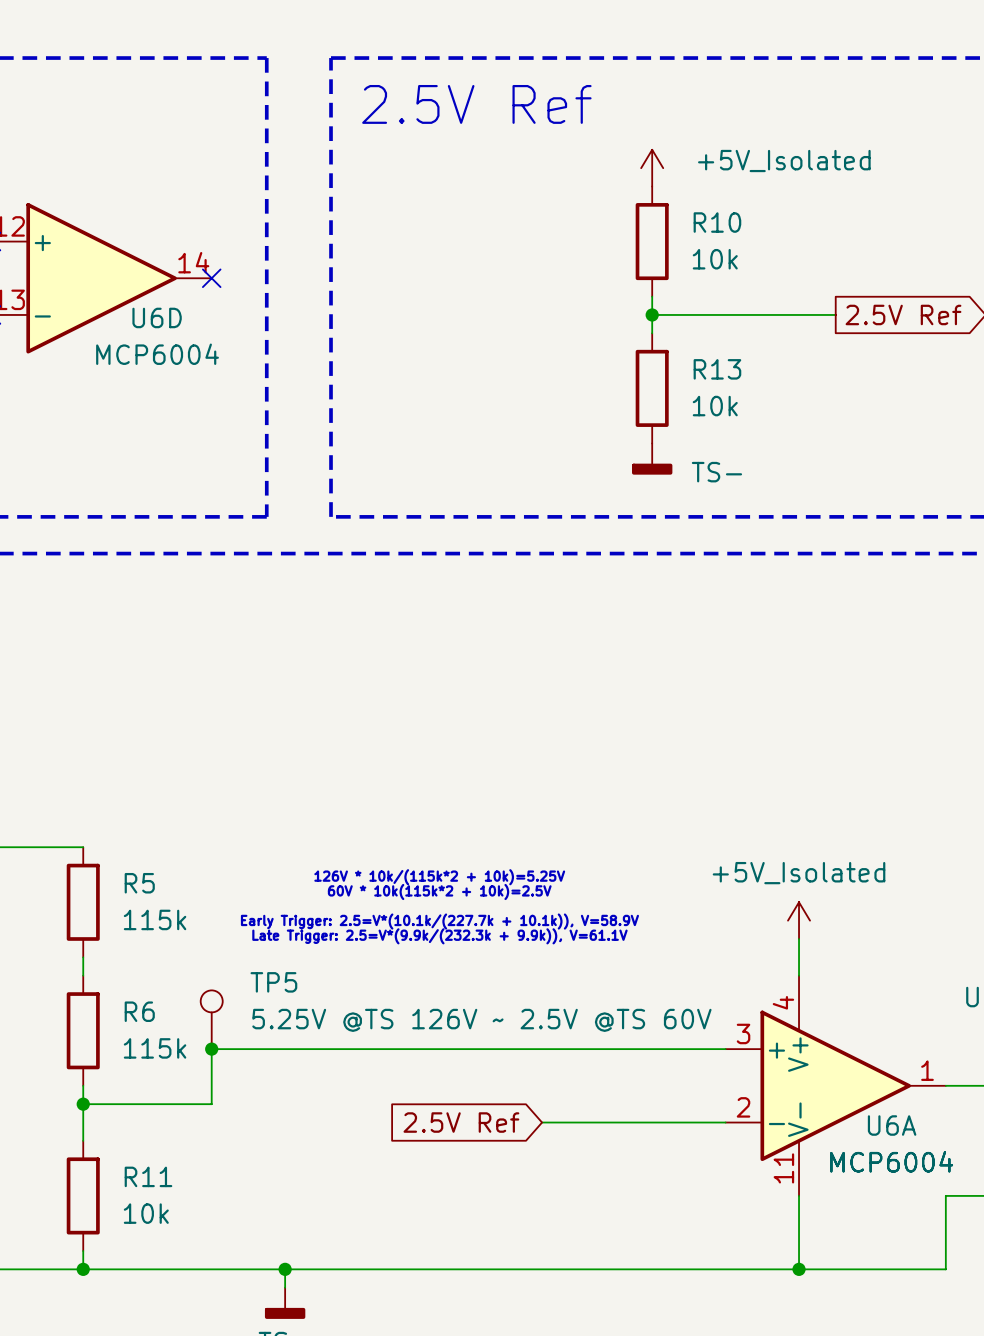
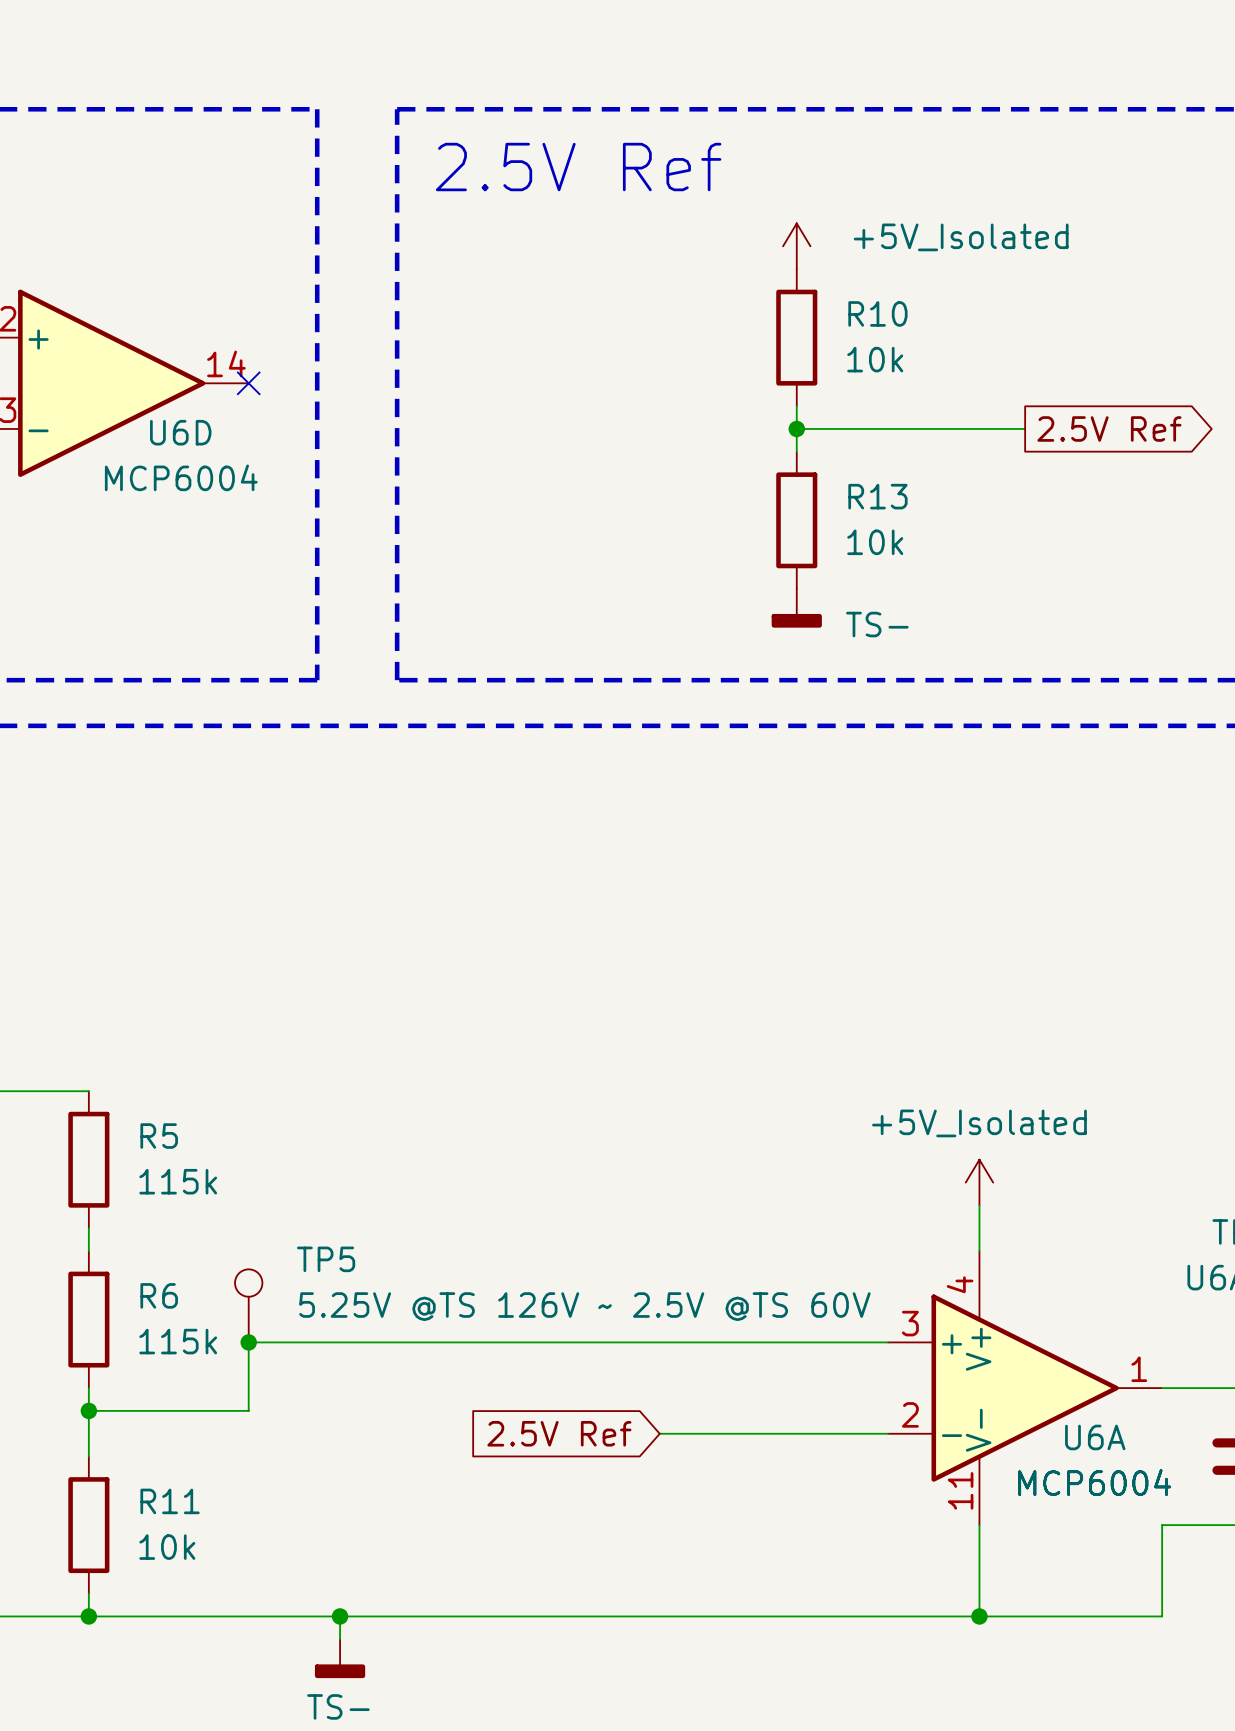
text: 126V * 10k/(115k*2 + 10k)=5.25V (439, 877) -> none
text: 60V * 10k(115k*2 + 10k)=2.5V (439, 891) -> none
text: Early Trigger: 2.5=V*(10.1k/(227.7k + 10.1k)), V=58.9V (439, 921) -> none
text: Late Trigger: 2.5=V*(9.9k/(232.3k + 9.9k)), V=61.1V (439, 936) -> none

